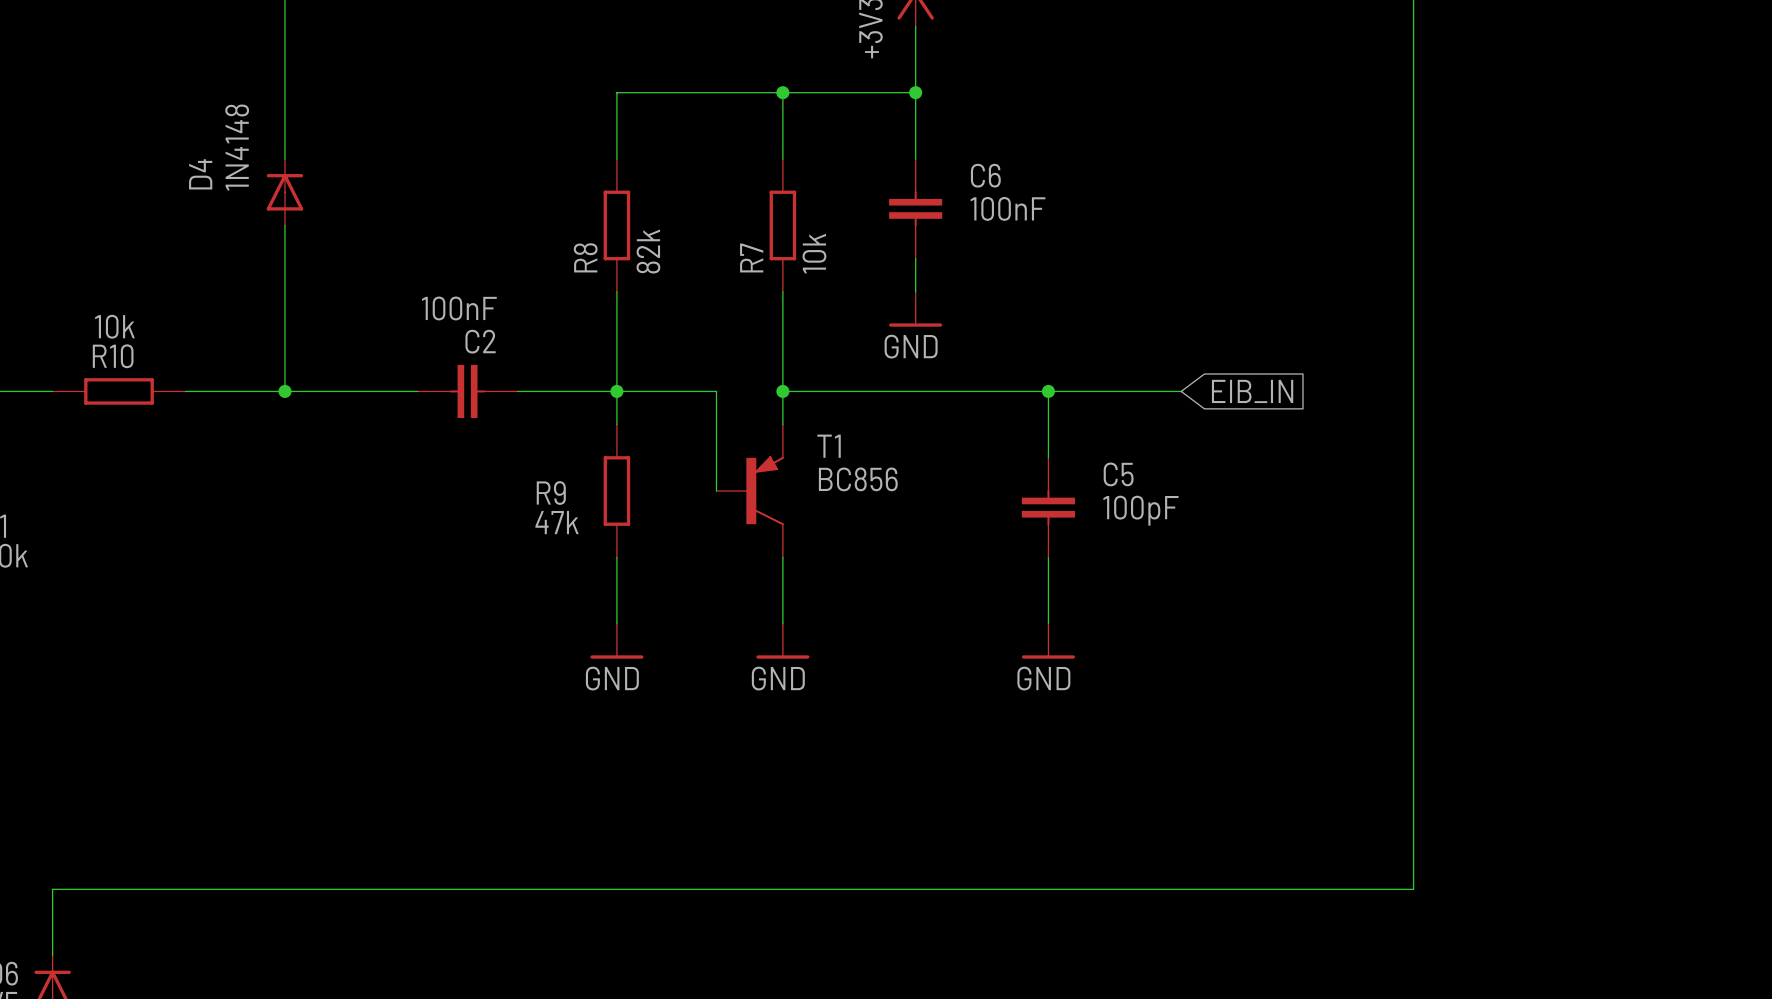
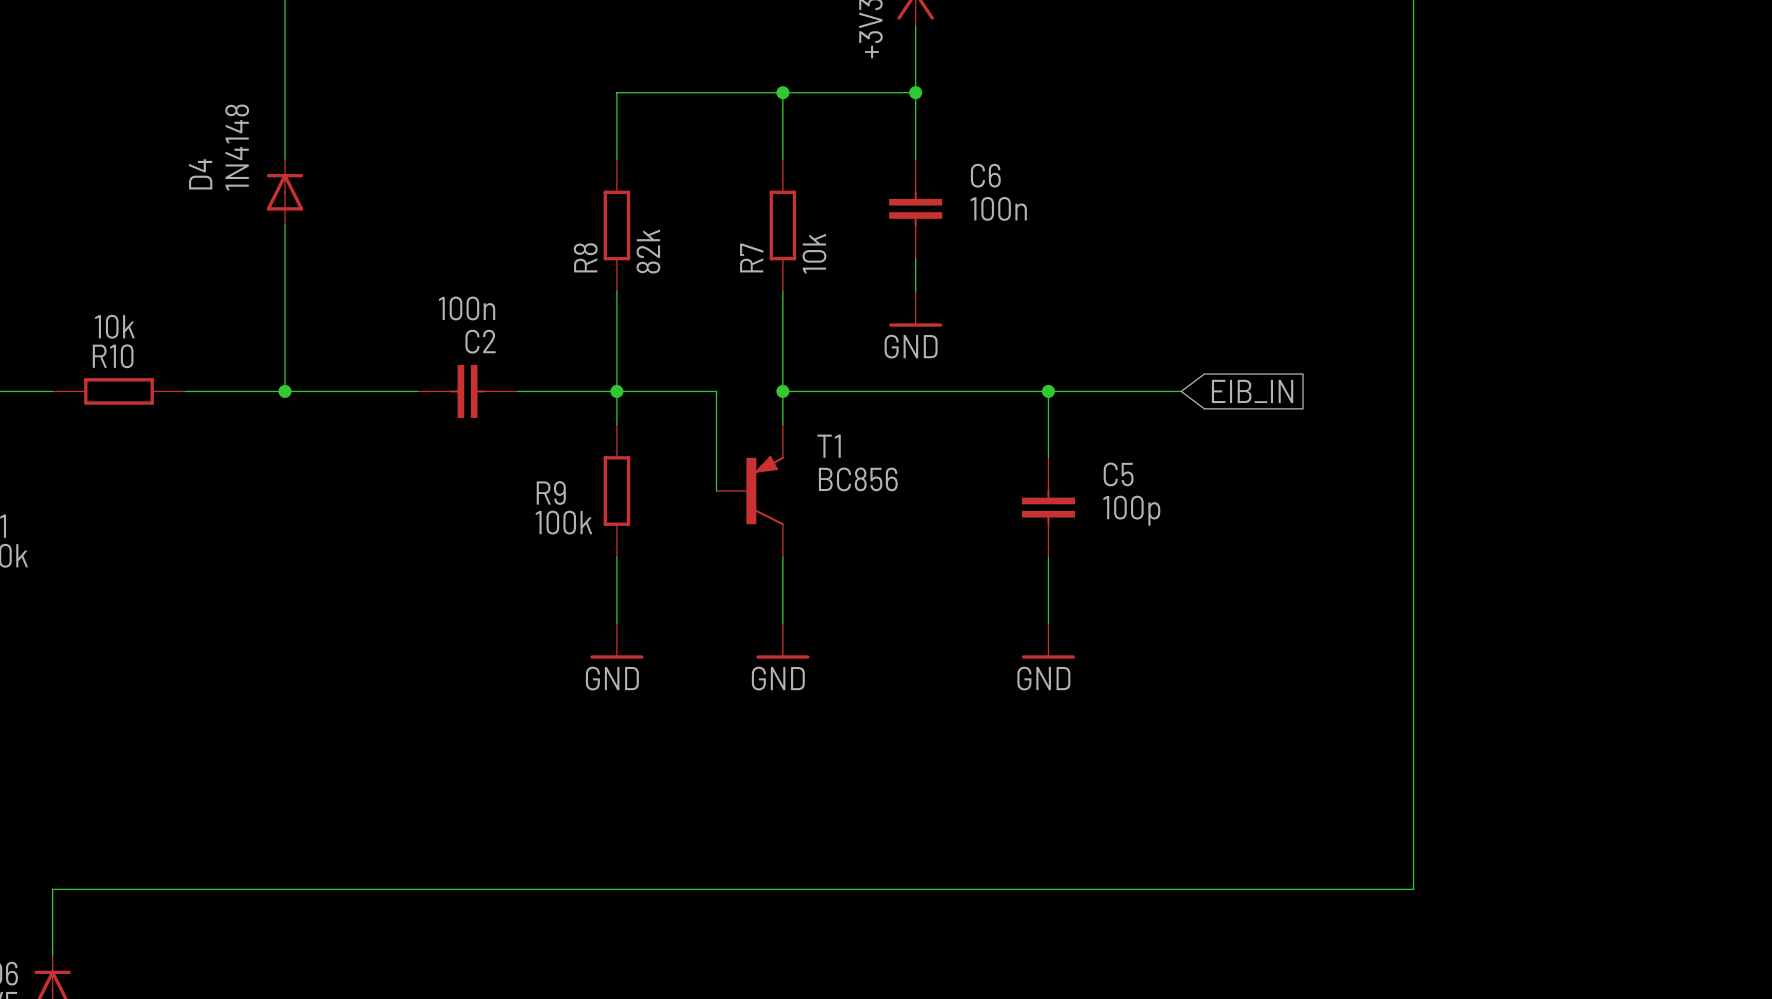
C6 value: 100nF (1007, 208) -> 100n (998, 208)
C2 value: 100nF (459, 308) -> 100n (467, 308)
C5 value: 100pF (1140, 510) -> 100p (1131, 510)
R9 value: 47k (556, 522) -> 100k (563, 522)

